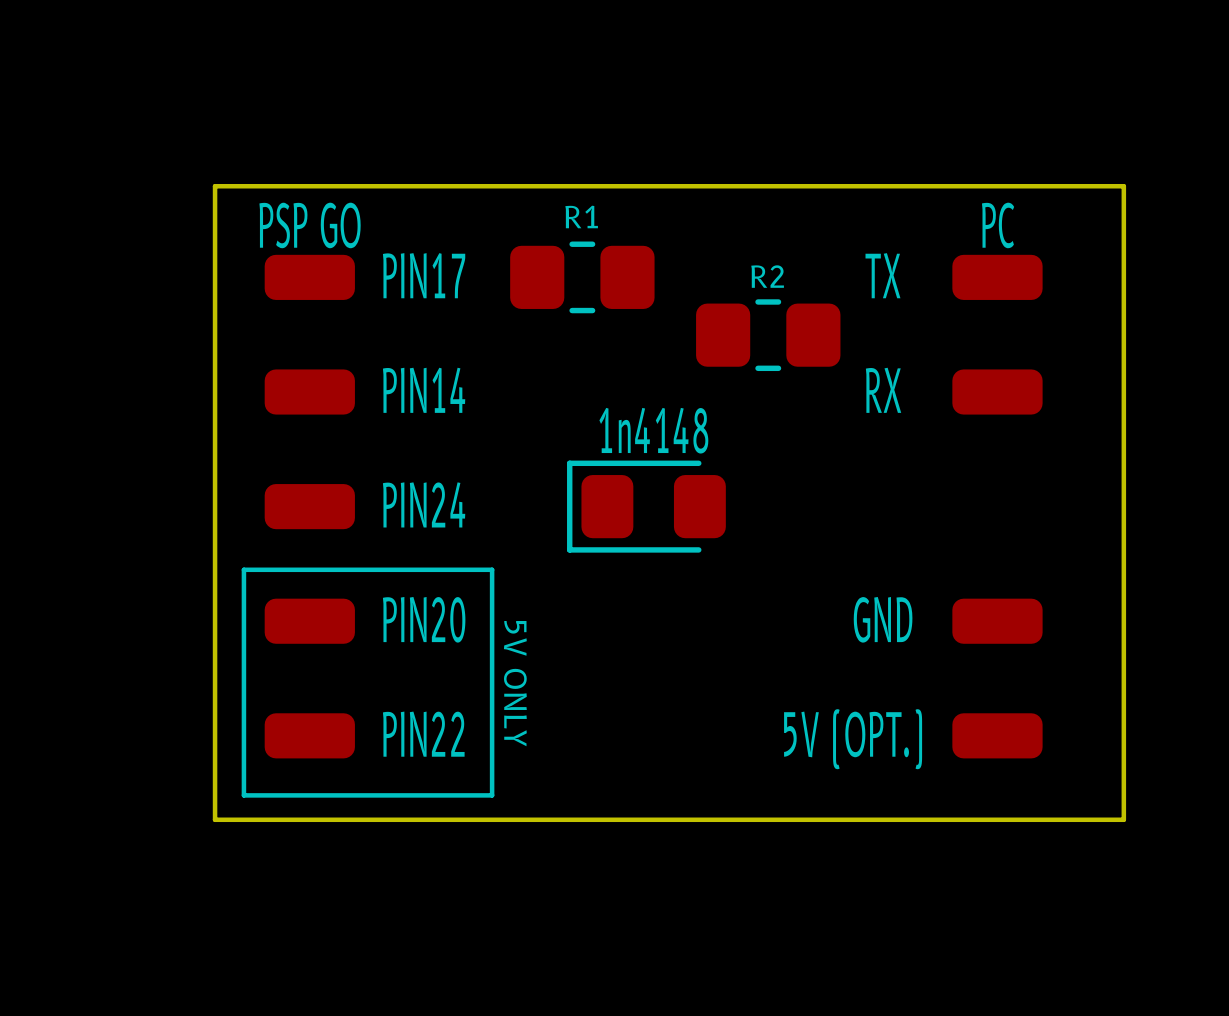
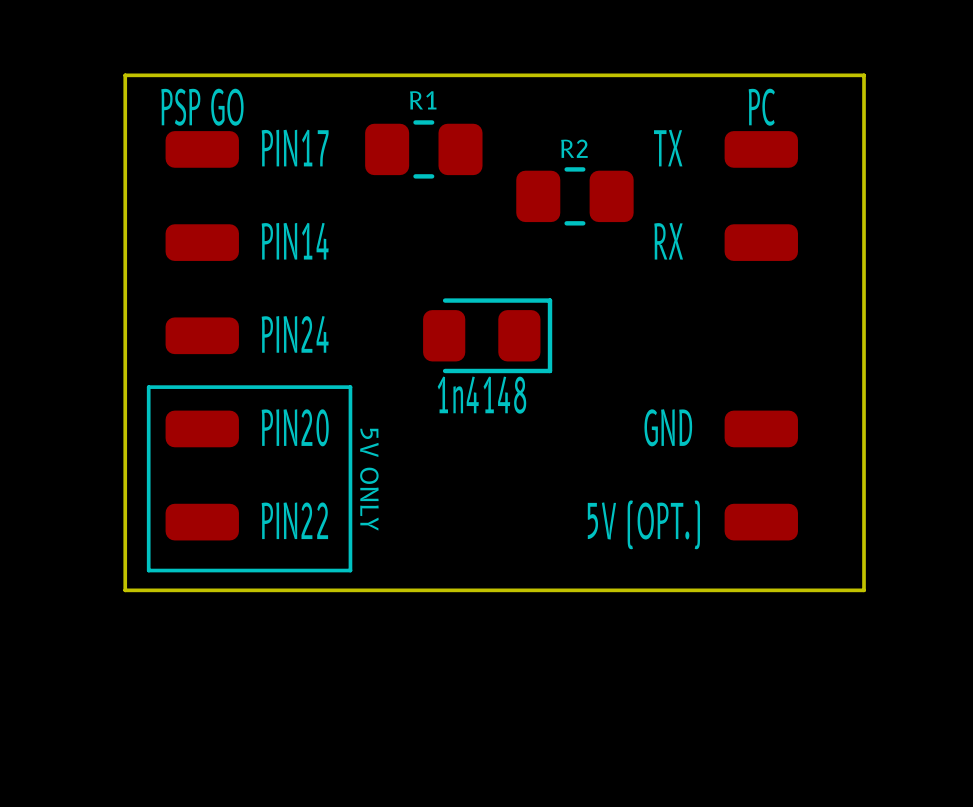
1n4148 rotation: 0° (646, 506) -> 180° (487, 335)

